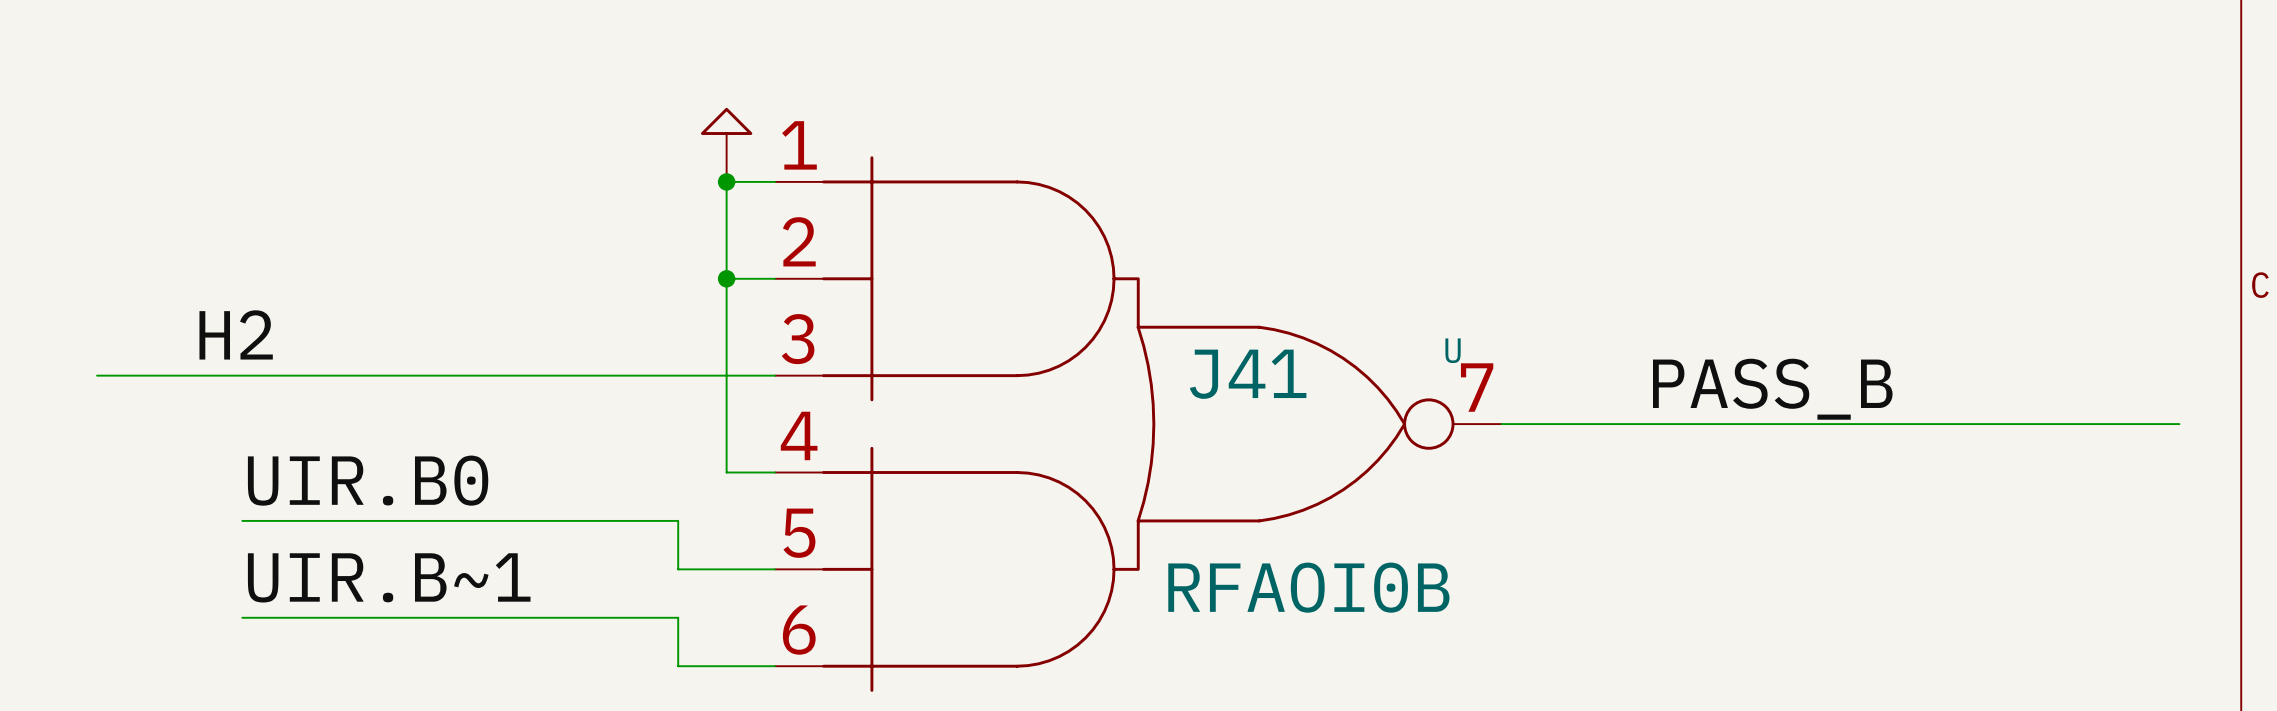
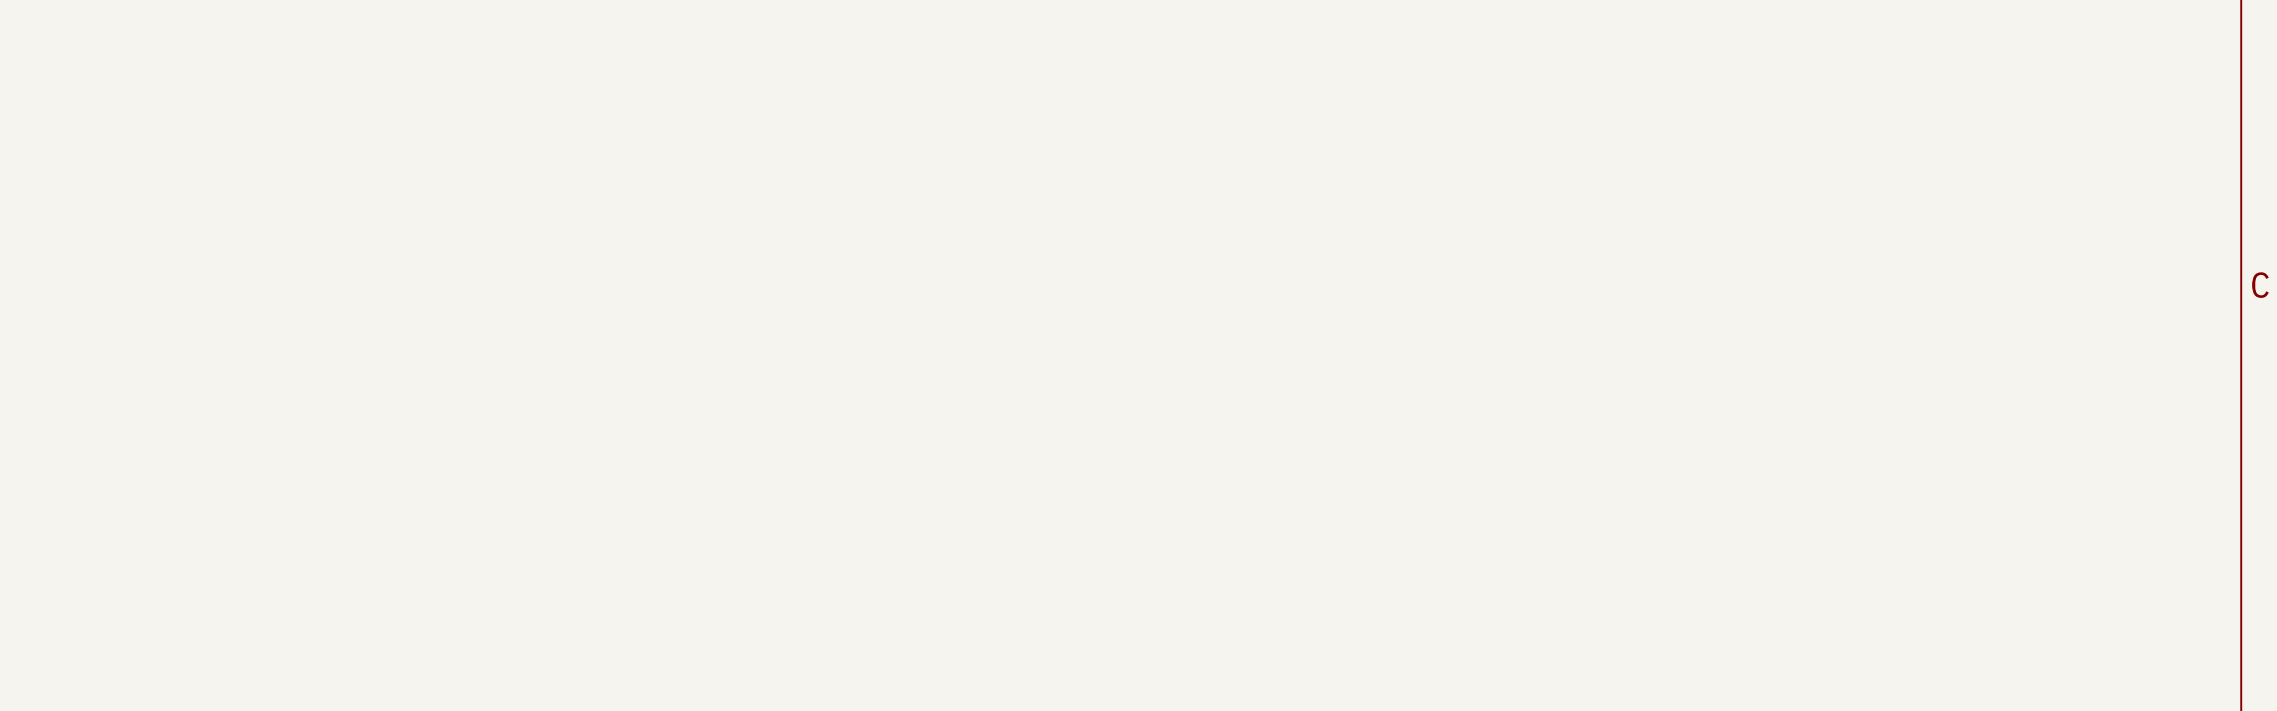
power symbol: (726, 144) -> none
junction: (726, 181) -> none
wire: (775, 181) (726, 181) (726, 472) (775, 472) -> none
wire: (726, 278) (775, 278) -> none
junction: (726, 278) -> none
label: H2 (236, 334) -> none
wire: (97, 375) (775, 375) -> none
label: PASS_B (1772, 389) -> none
U: (1138, 424) -> none
wire: (1501, 424) (2179, 424) -> none
label: UIR.B0 (368, 480) -> none
wire: (242, 520) (678, 520) (678, 569) (775, 569) -> none
label: UIR.B~1 (389, 577) -> none
wire: (242, 617) (678, 617) (678, 666) (775, 666) -> none

